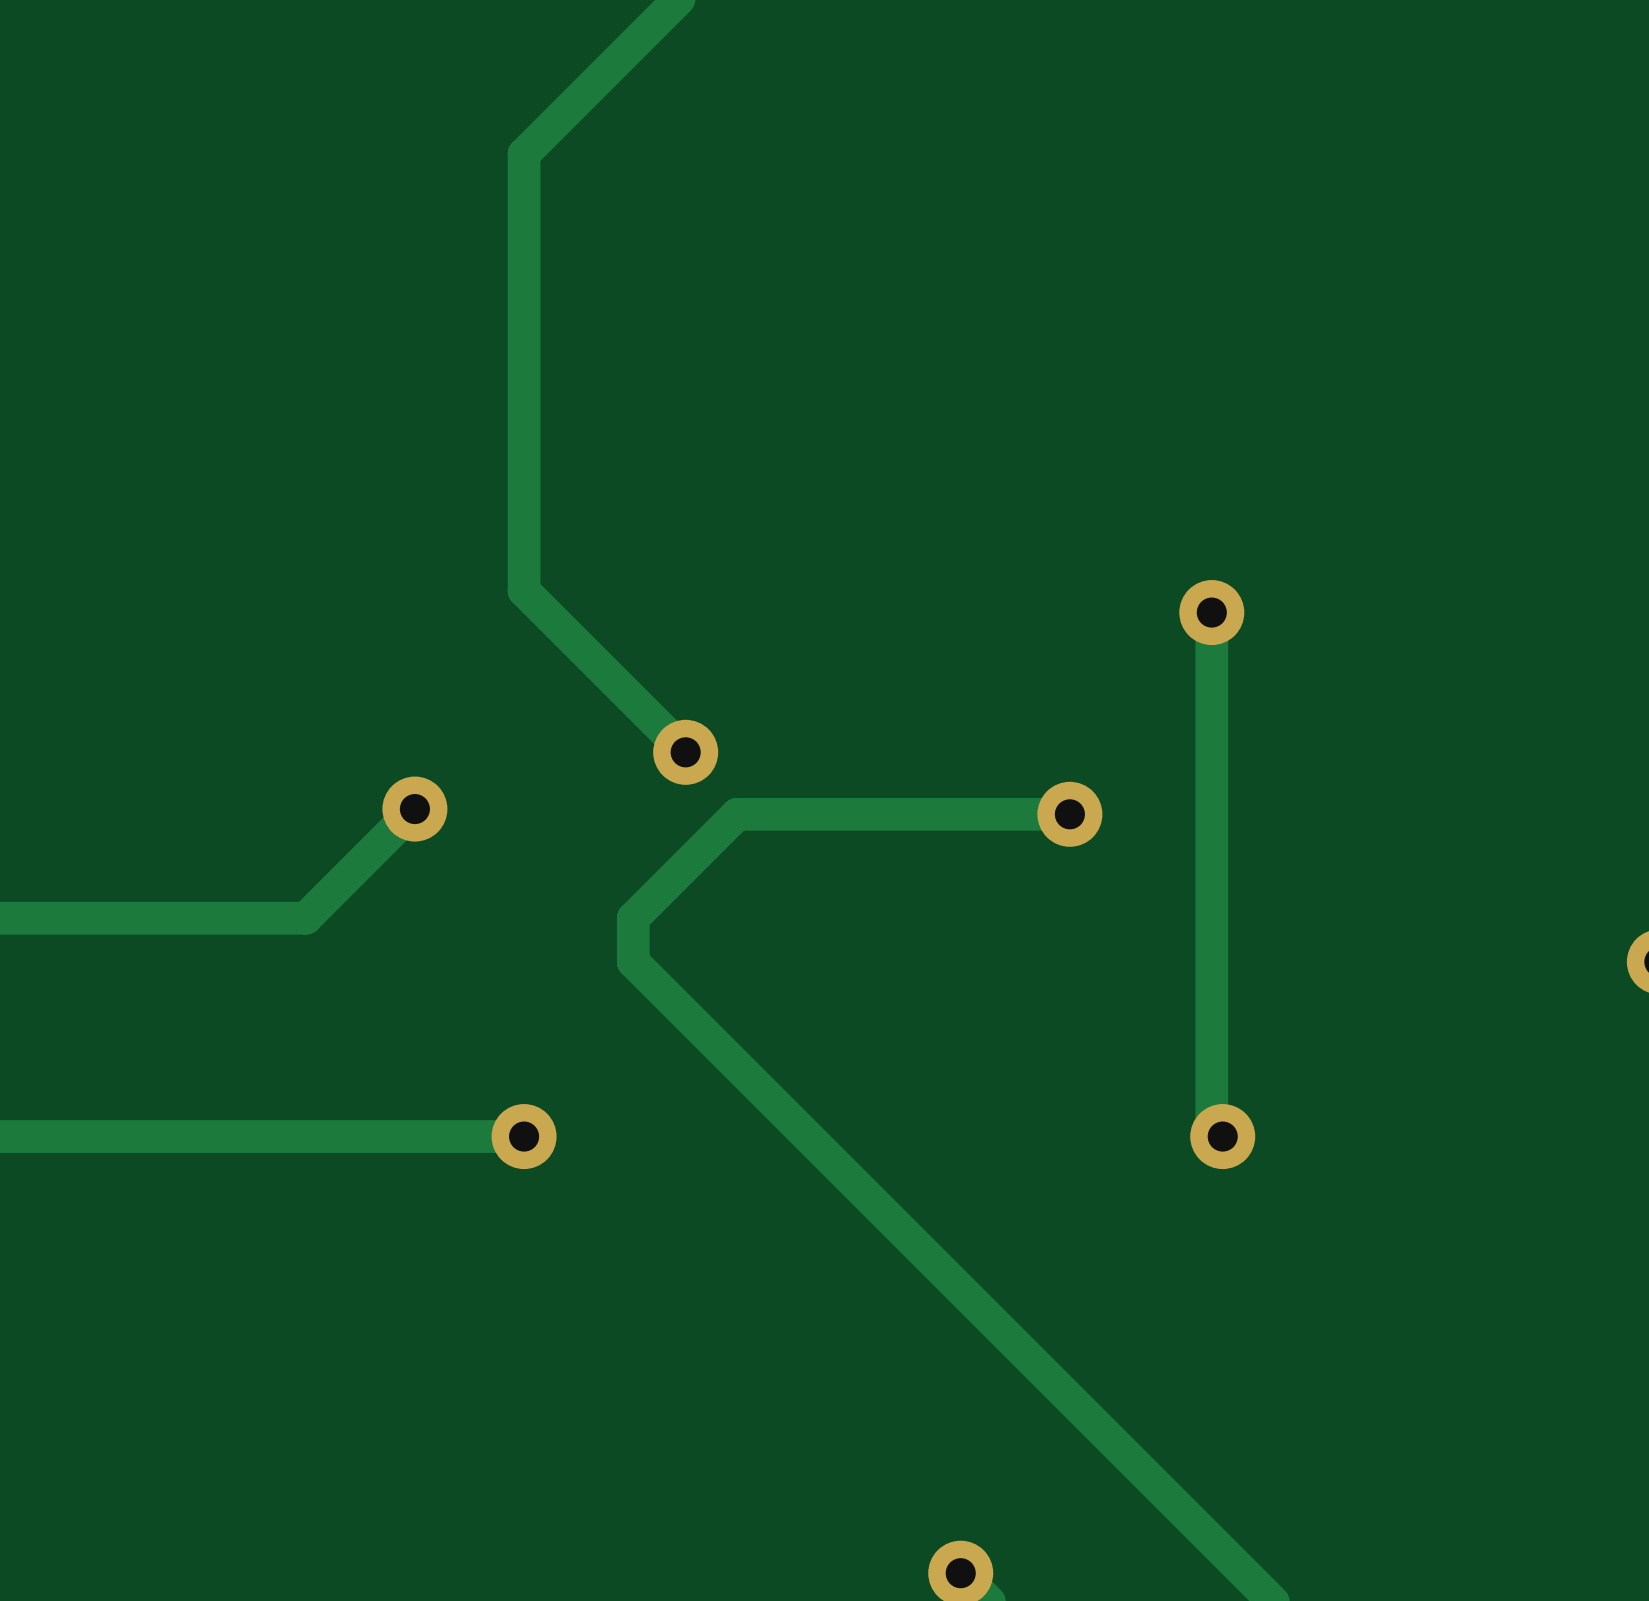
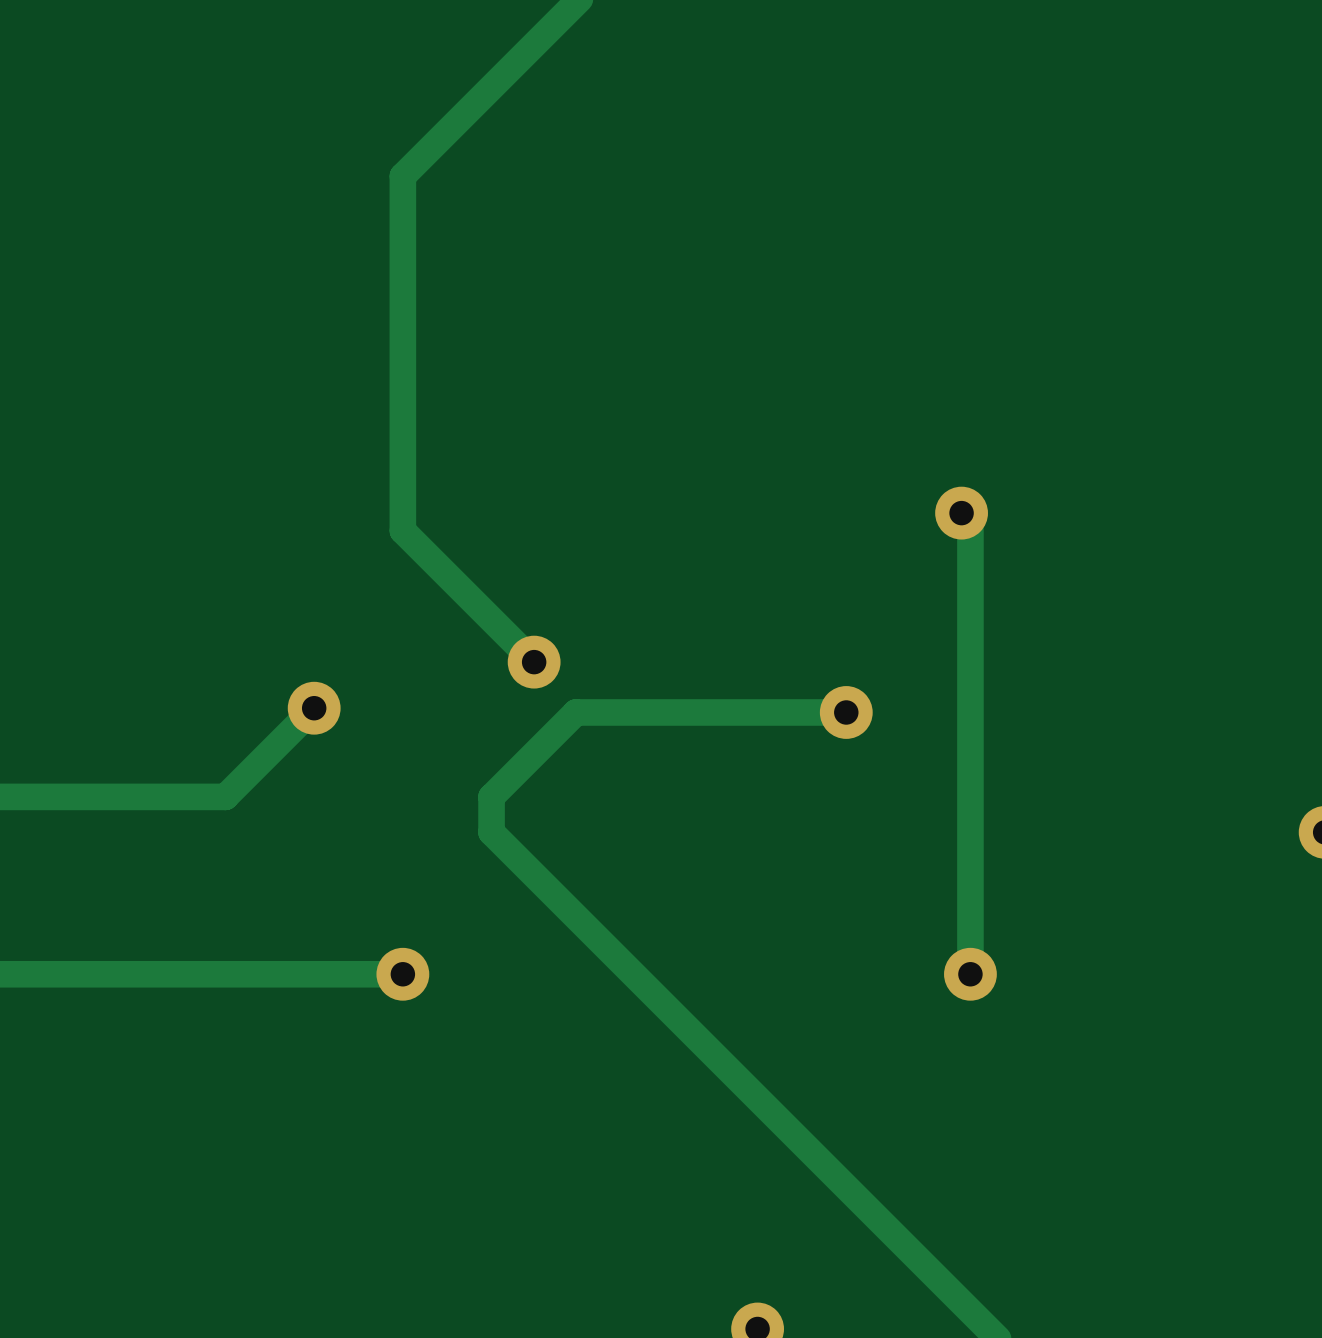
track: (1211, 612) (1211, 1125) (1222, 1136) -> (961, 513) (970, 521) (970, 974)
via position: (1211, 612) -> (961, 513)

